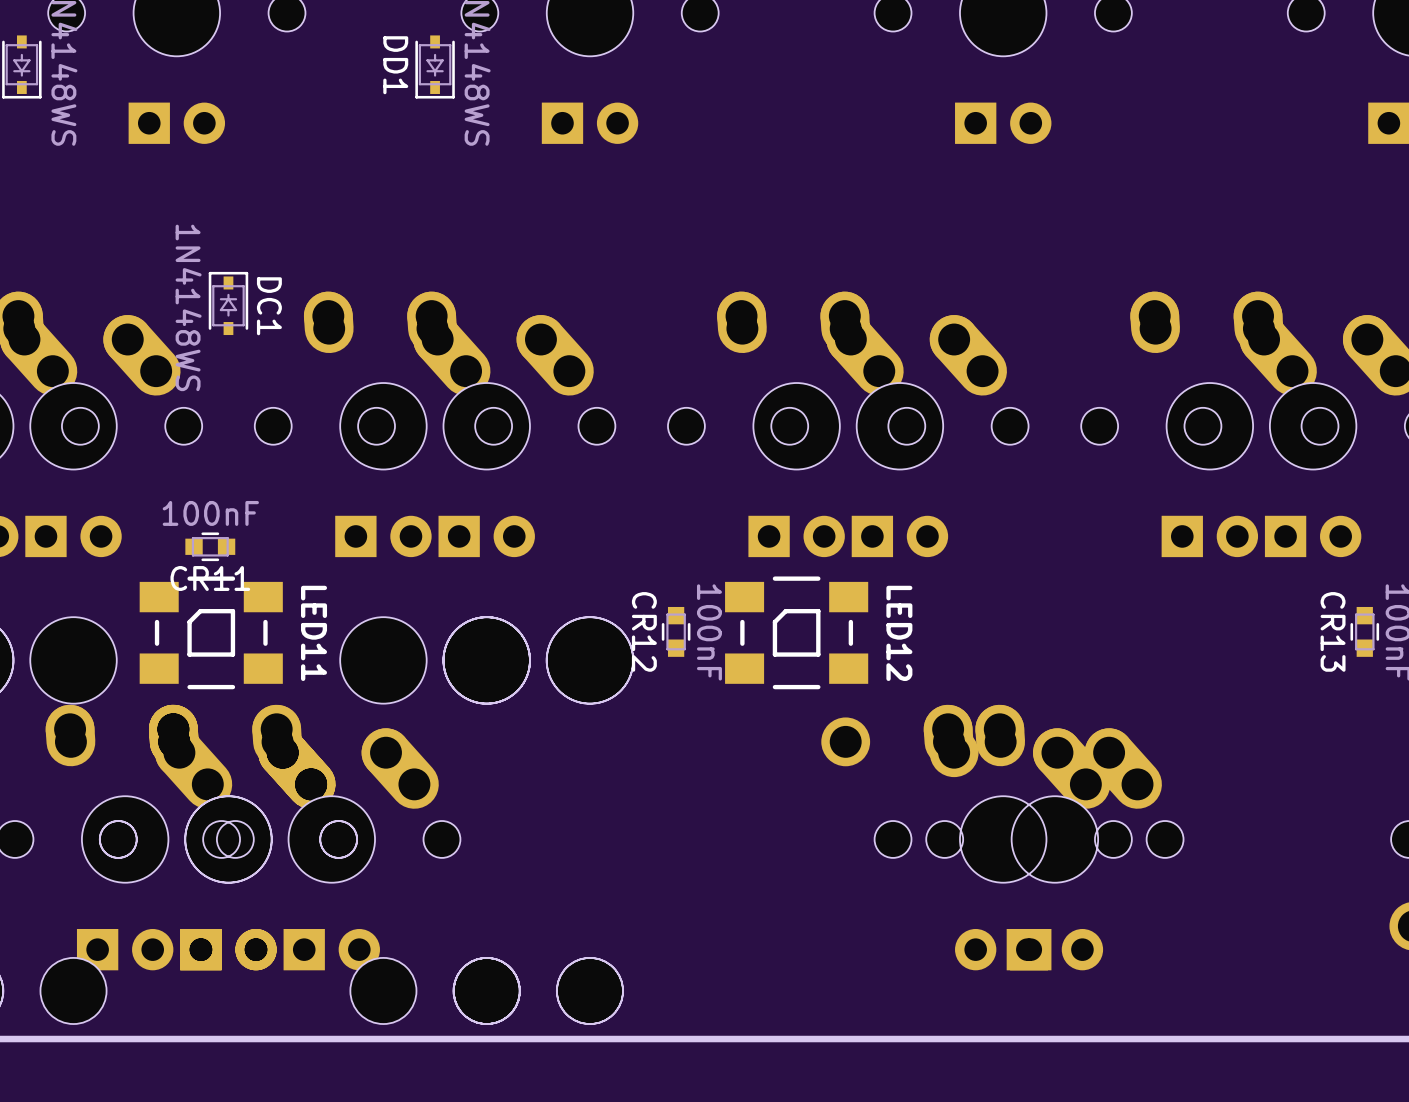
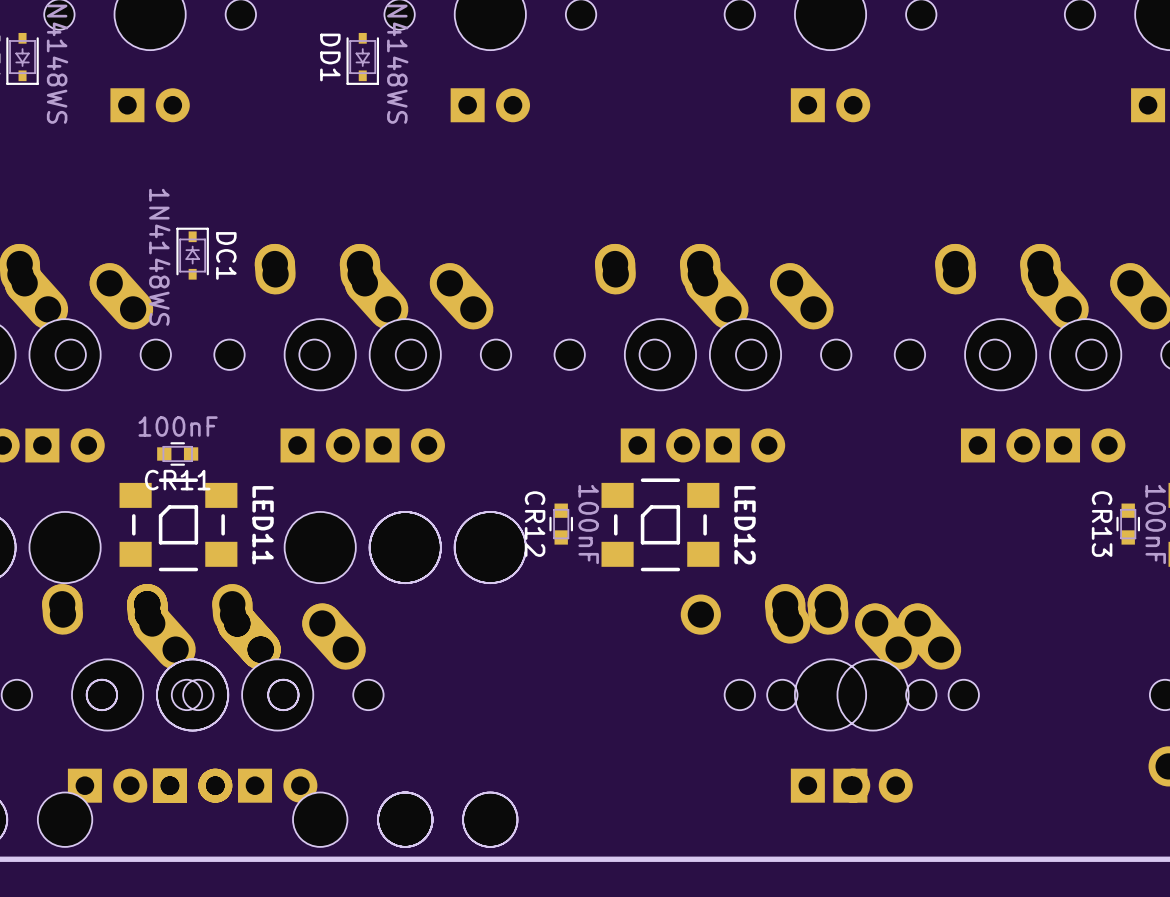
part footprint: [874, 704, 1132, 971] -> [724, 584, 937, 803]

